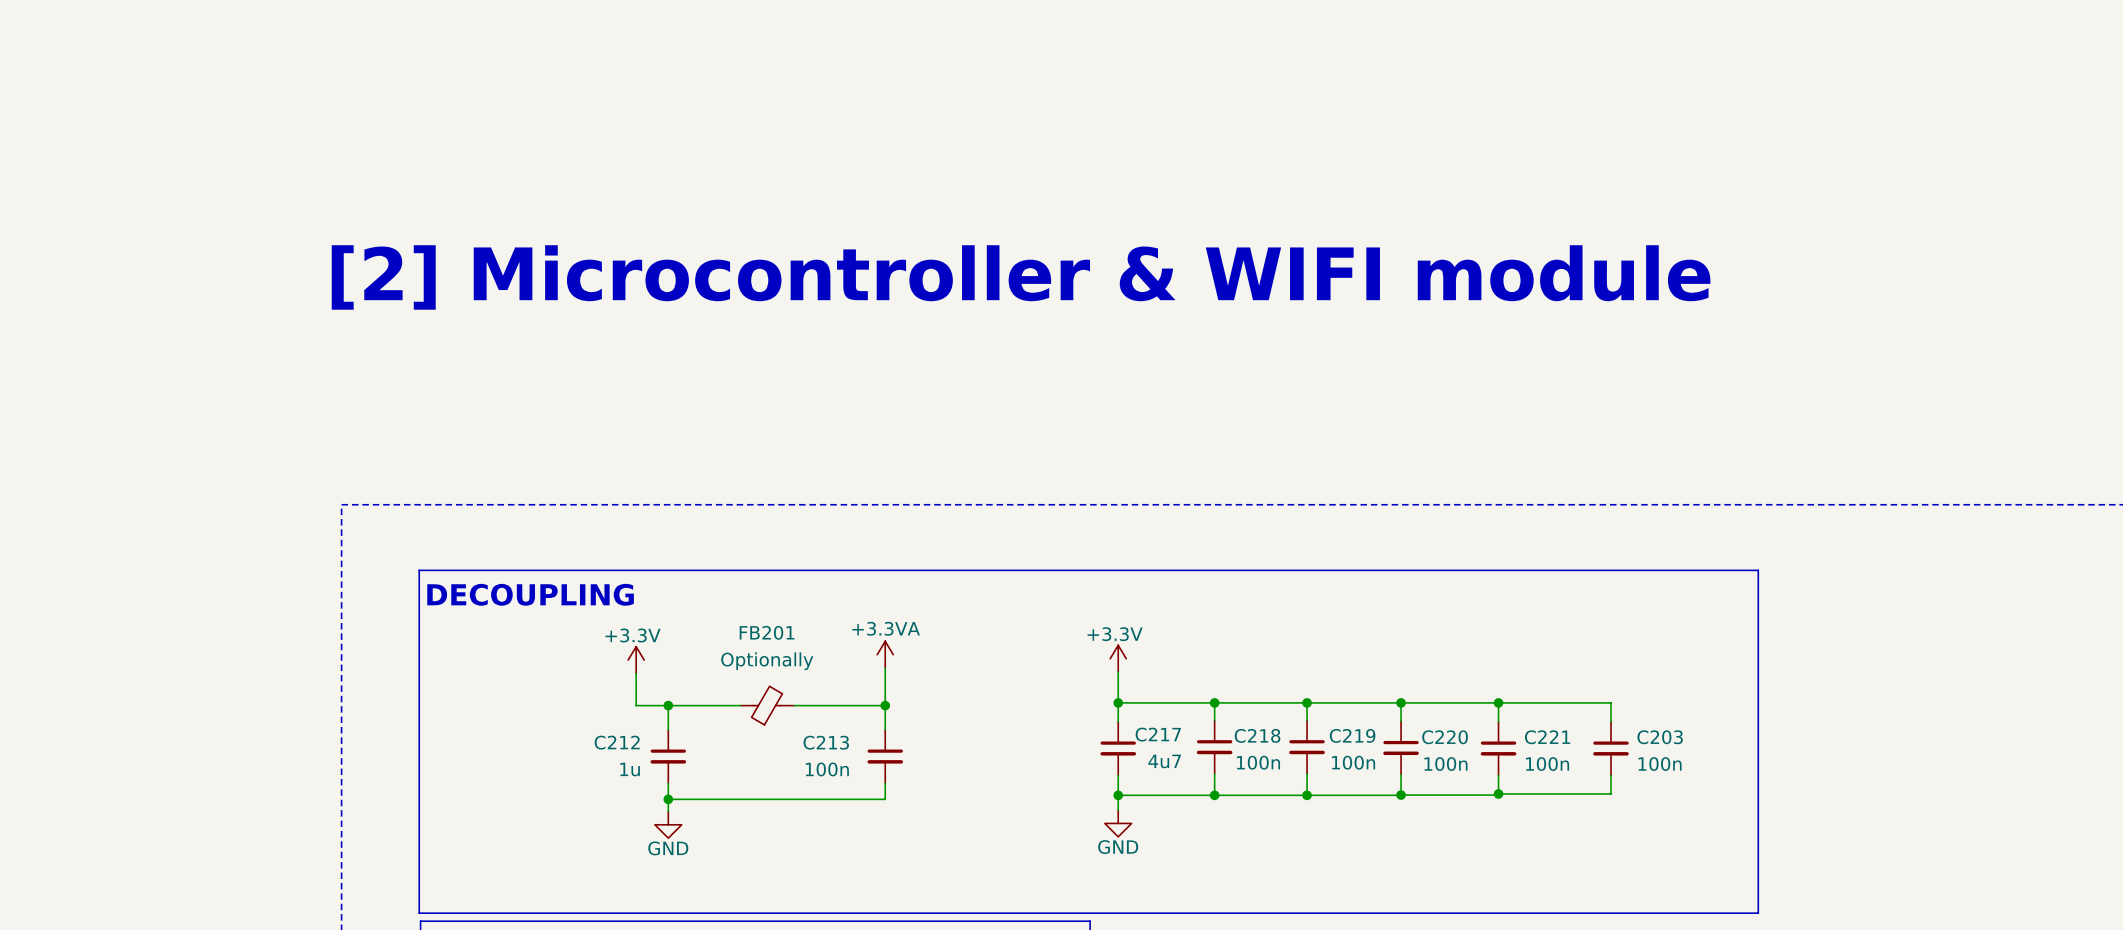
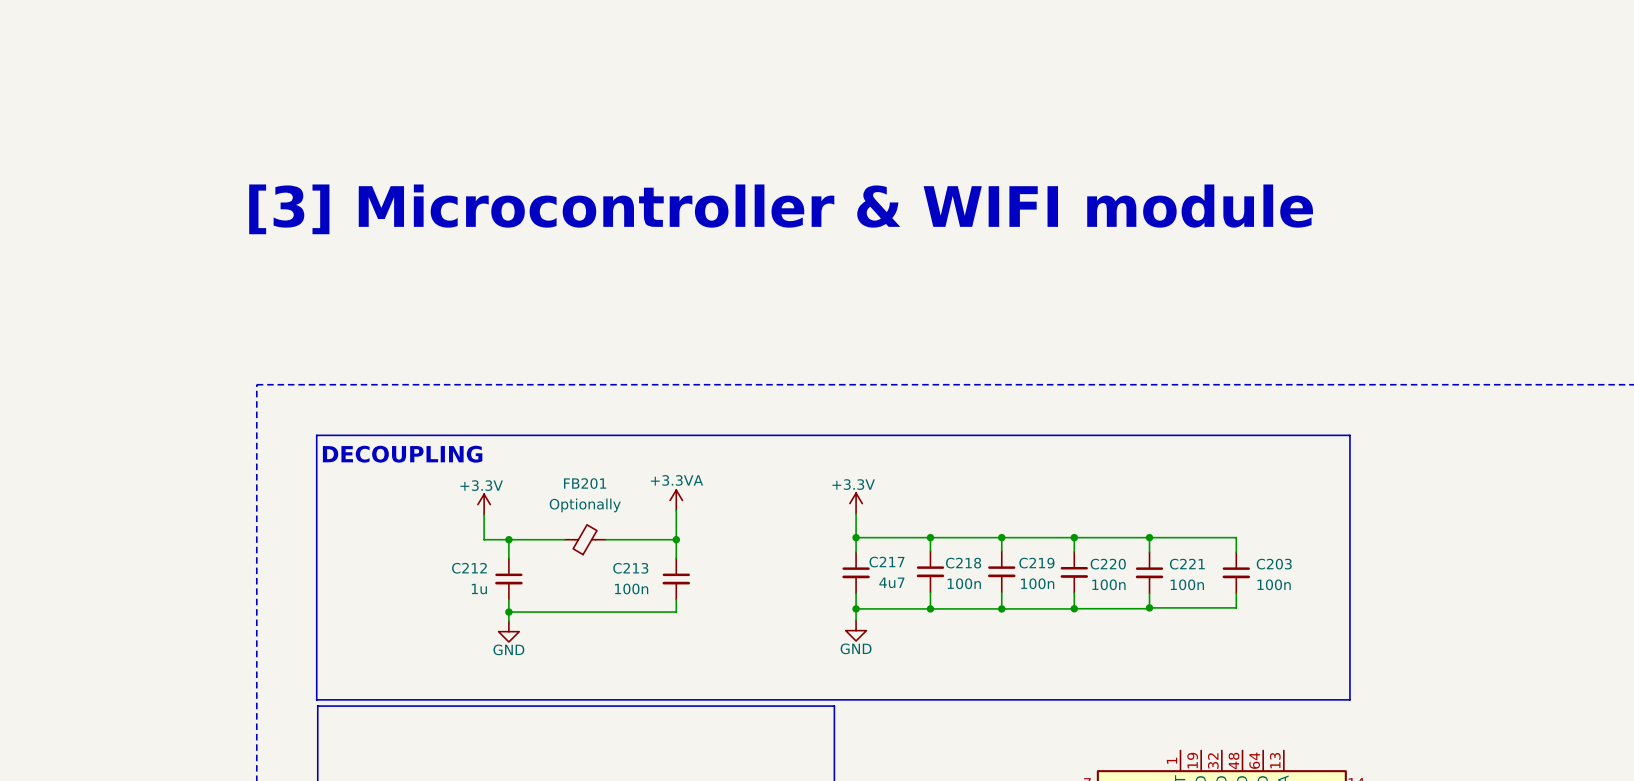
text: [2] Microcontroller & WIFI module (1021, 277) -> [3] Microcontroller & WIFI module (781, 209)

